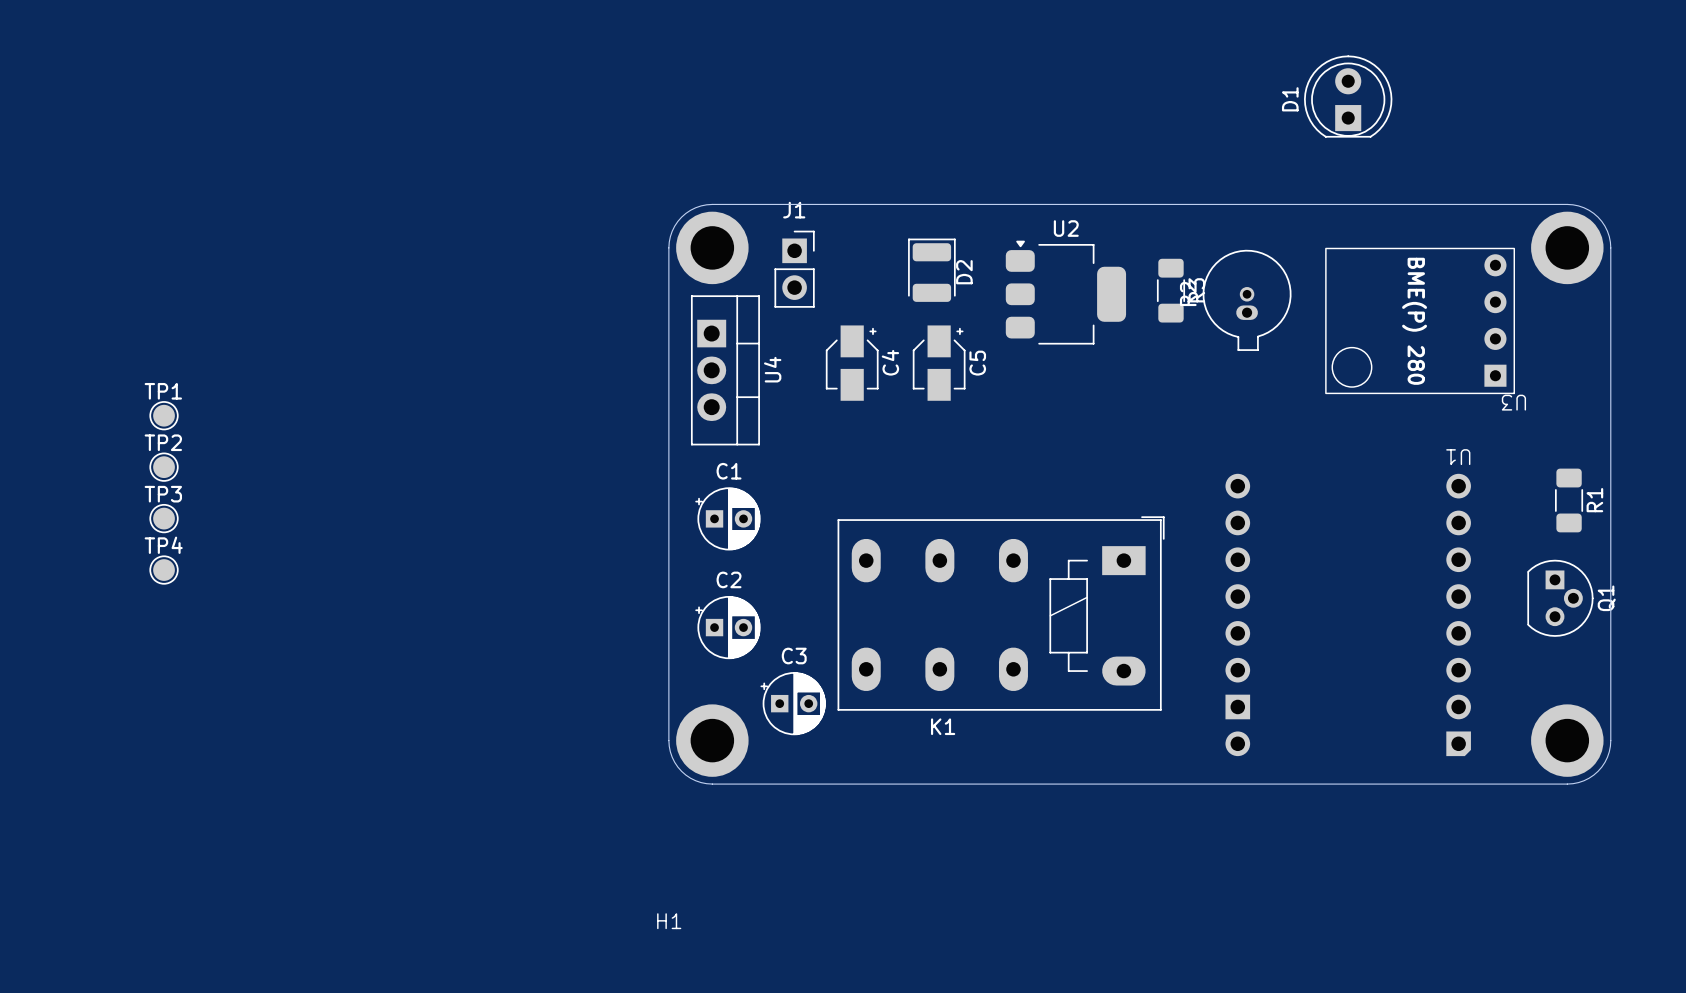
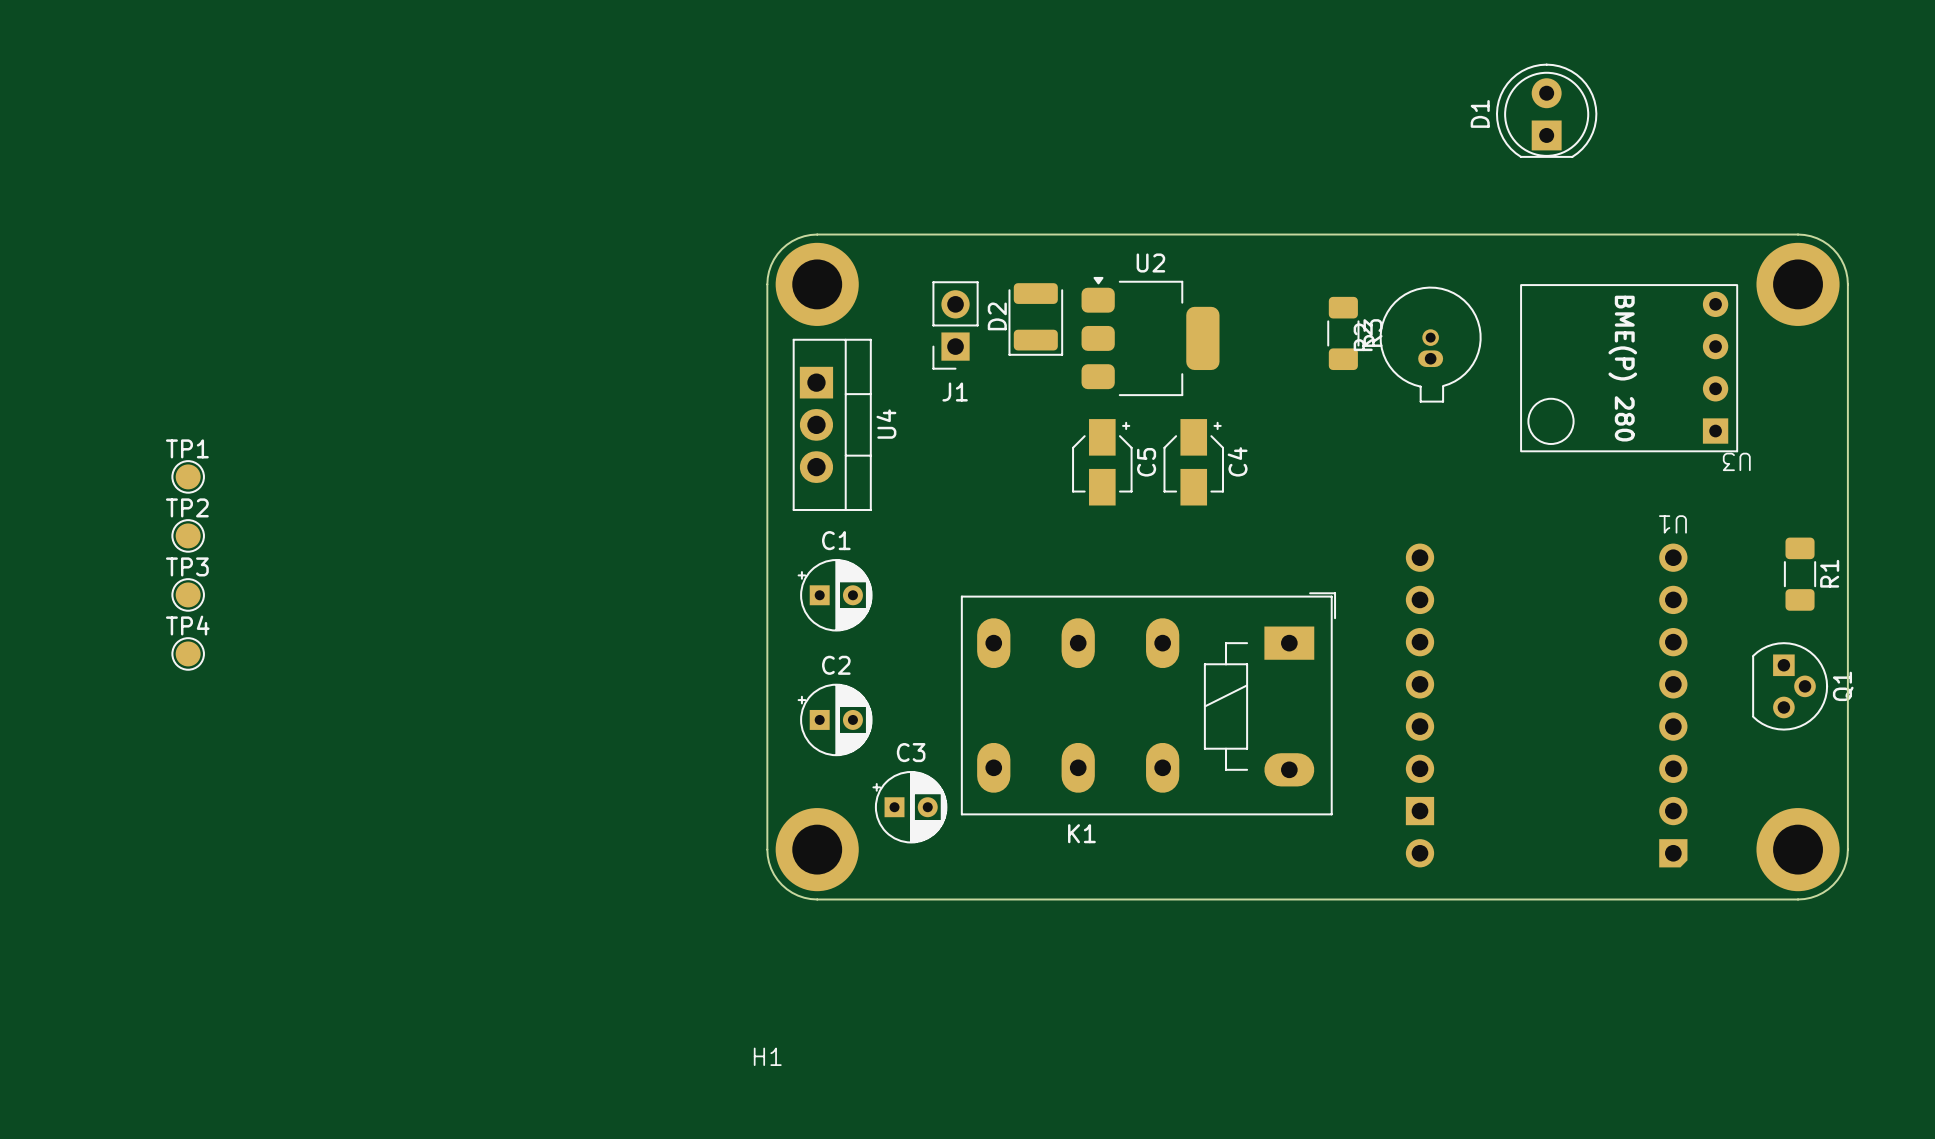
J1 rotation: 0° (794, 269) -> 180° (955, 325)
D2 rotation: 0° (931, 270) -> 180° (1035, 319)
U2 position: (1065, 292) -> (1150, 336)
C4 position: (852, 363) -> (1193, 462)
C5 position: (939, 363) -> (1102, 462)

